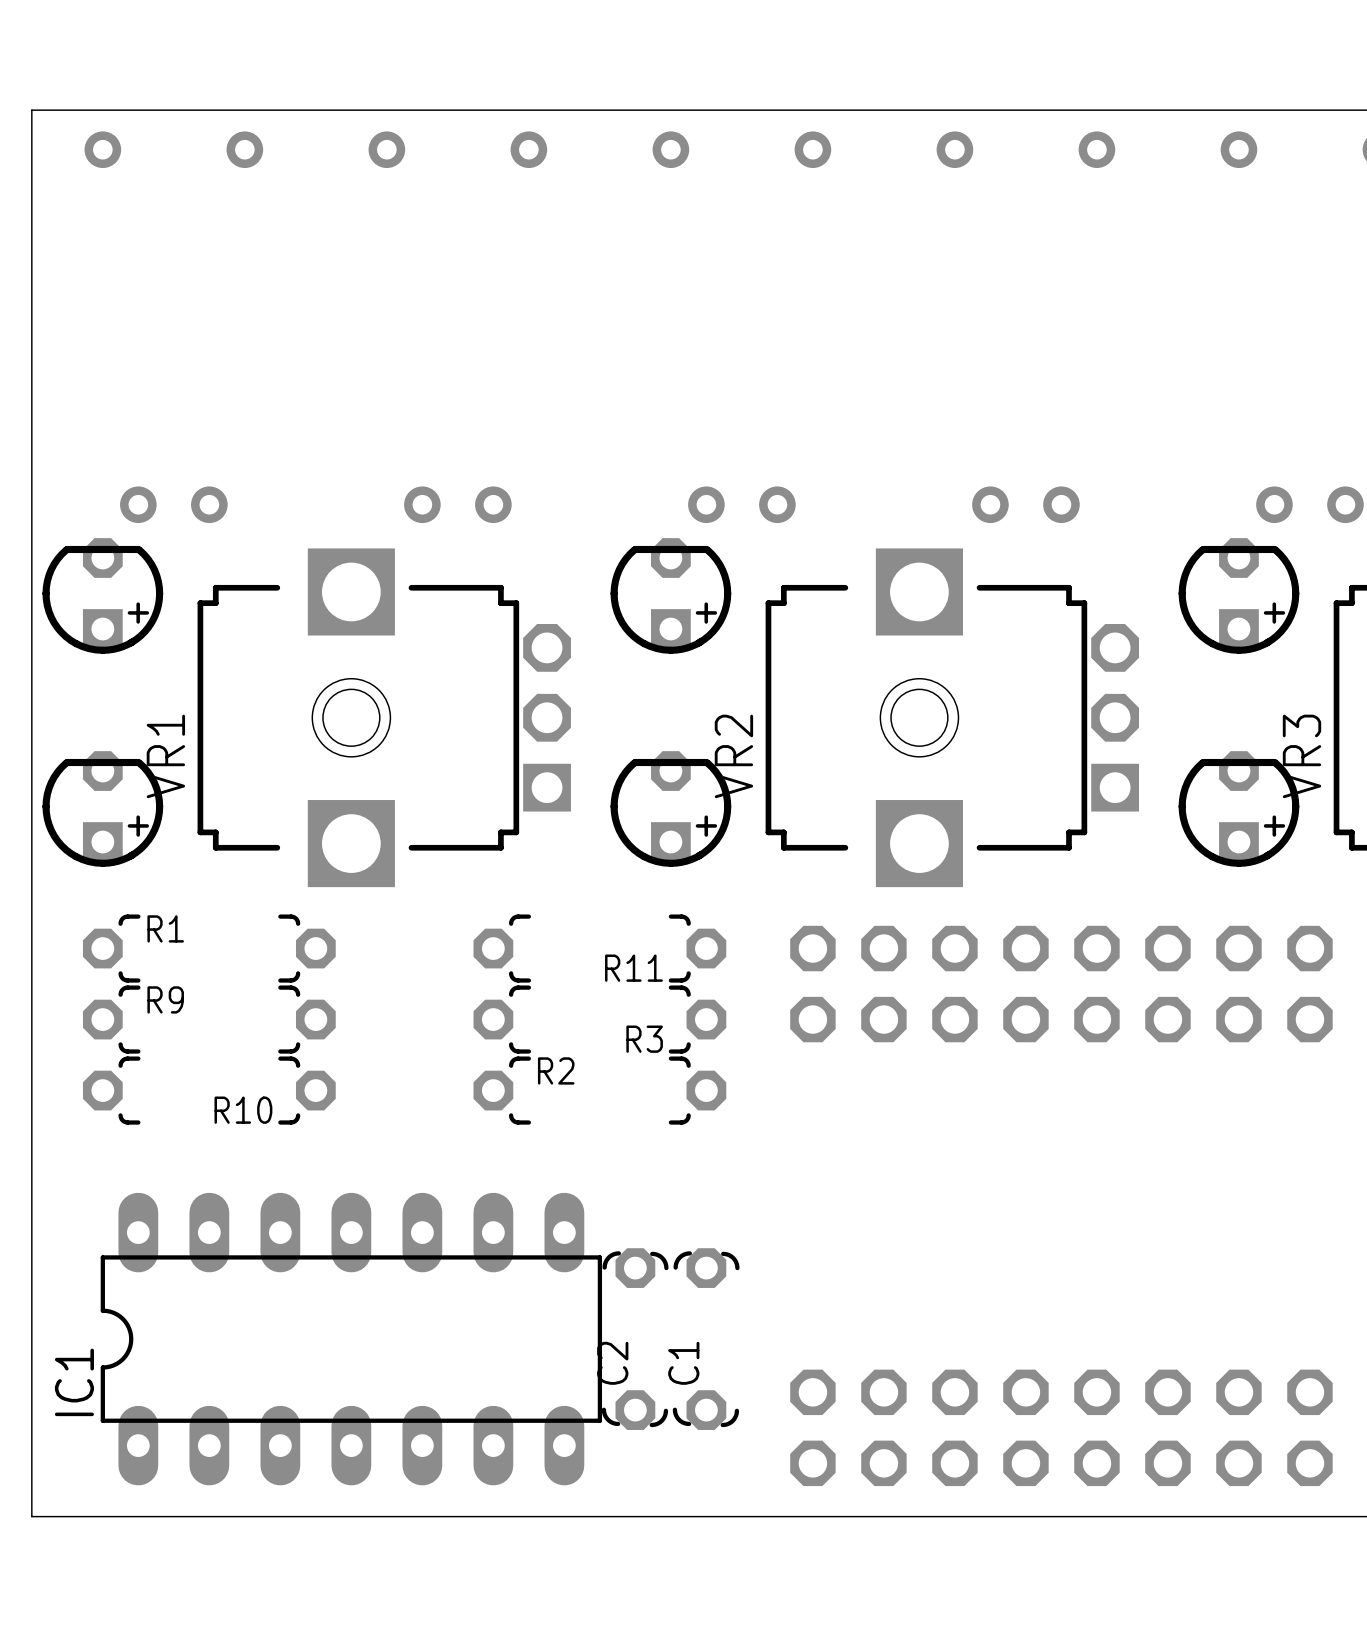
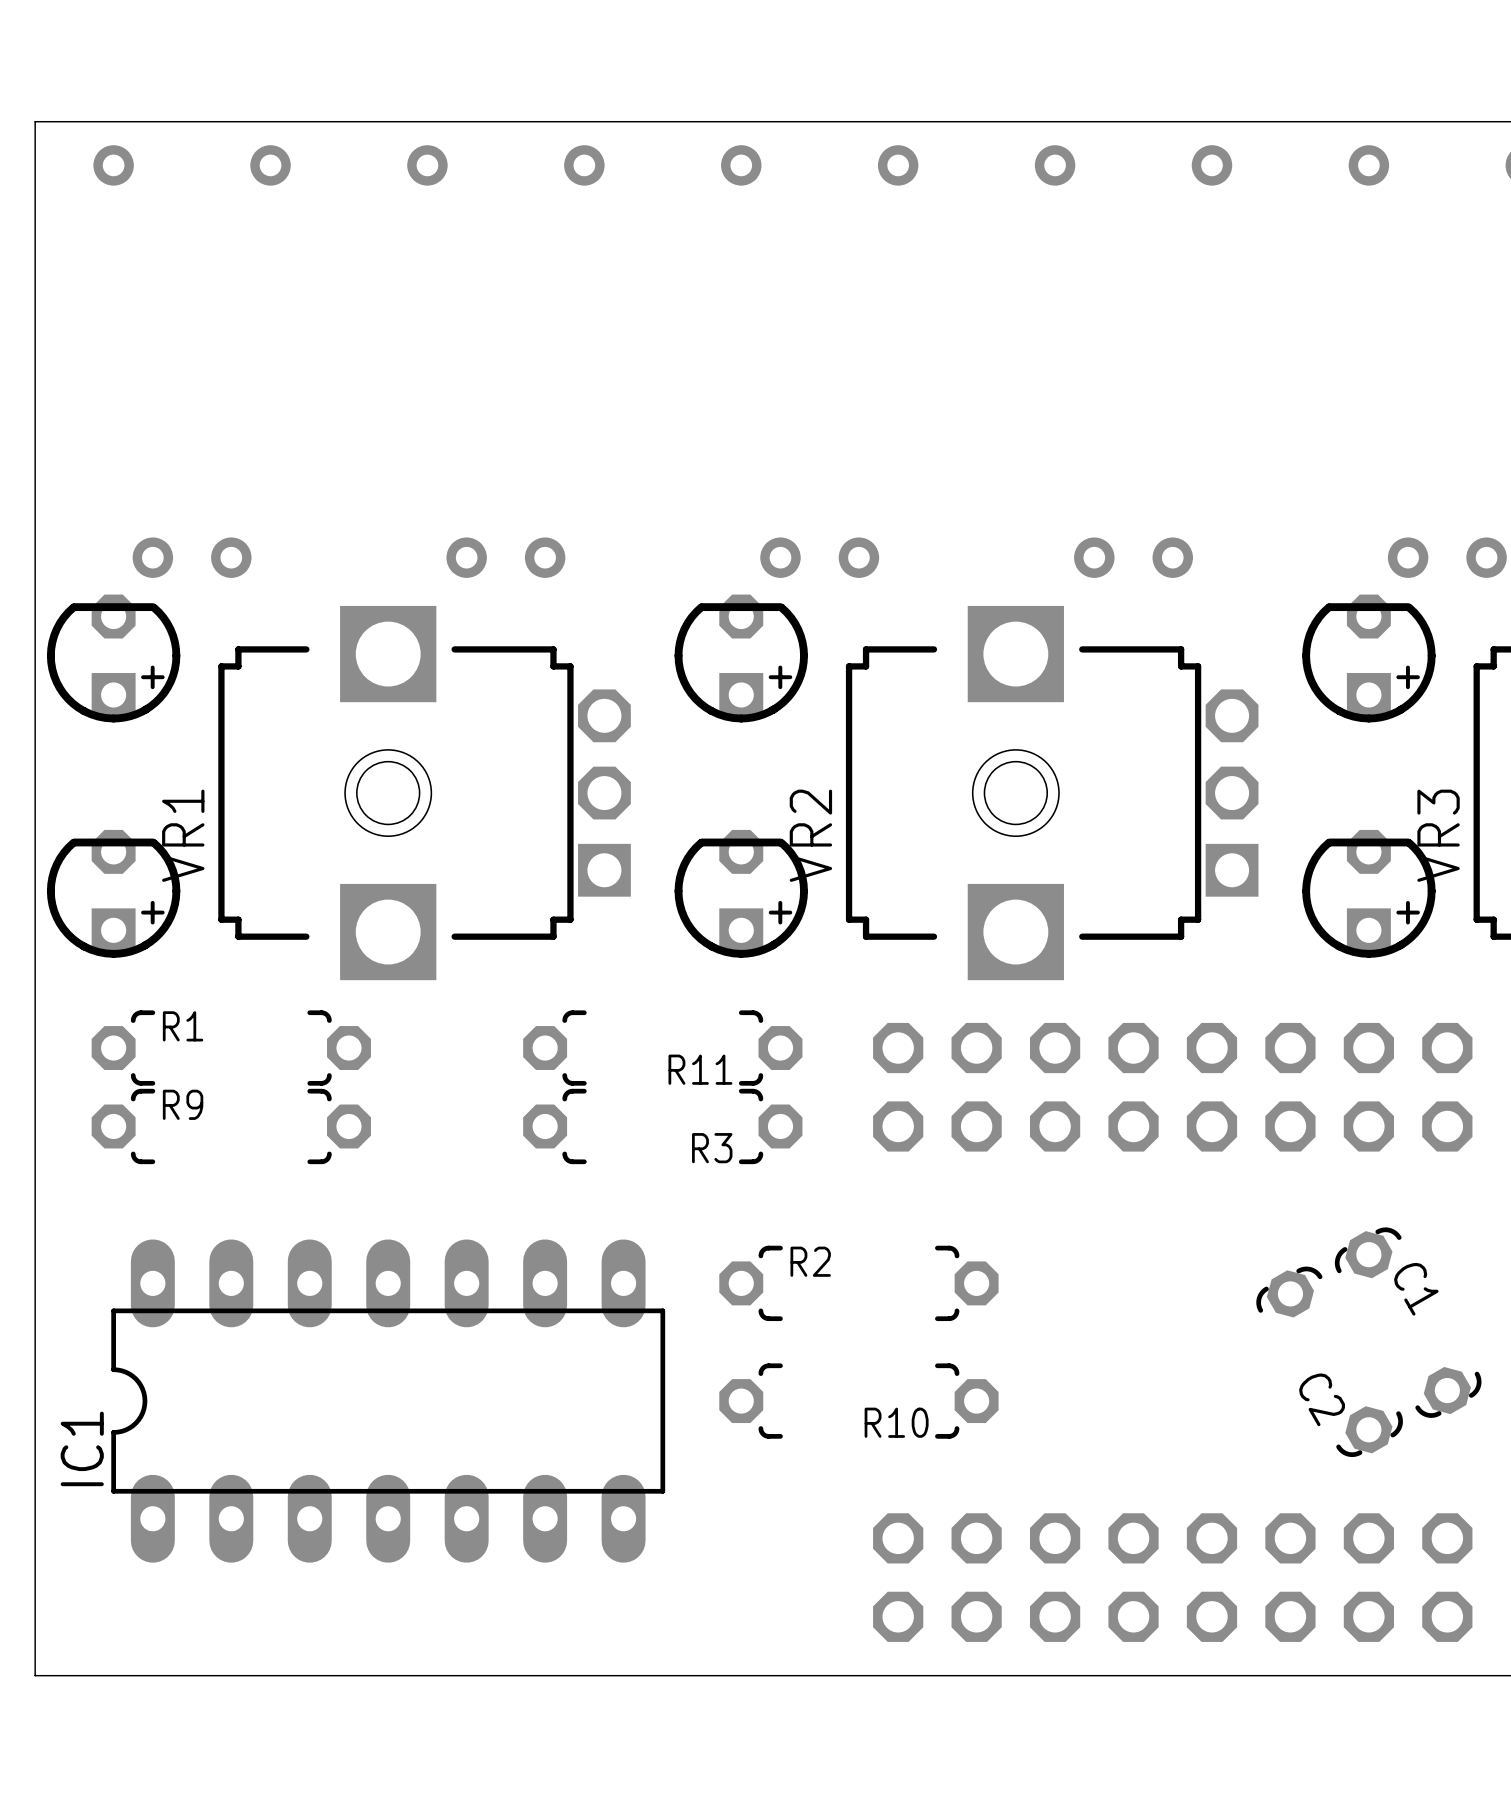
R10 position: (209, 1090) -> (858, 1401)
R2 position: (599, 1090) -> (858, 1283)
IC1 position: (351, 1339) -> (388, 1401)
C2 rotation: 0° (635, 1339) -> 30° counterclockwise (1329, 1361)
C2 position: (635, 1339) -> (1329, 1361)
C1 rotation: 0° (706, 1339) -> 30° counterclockwise (1408, 1322)
C1 position: (706, 1339) -> (1408, 1322)

